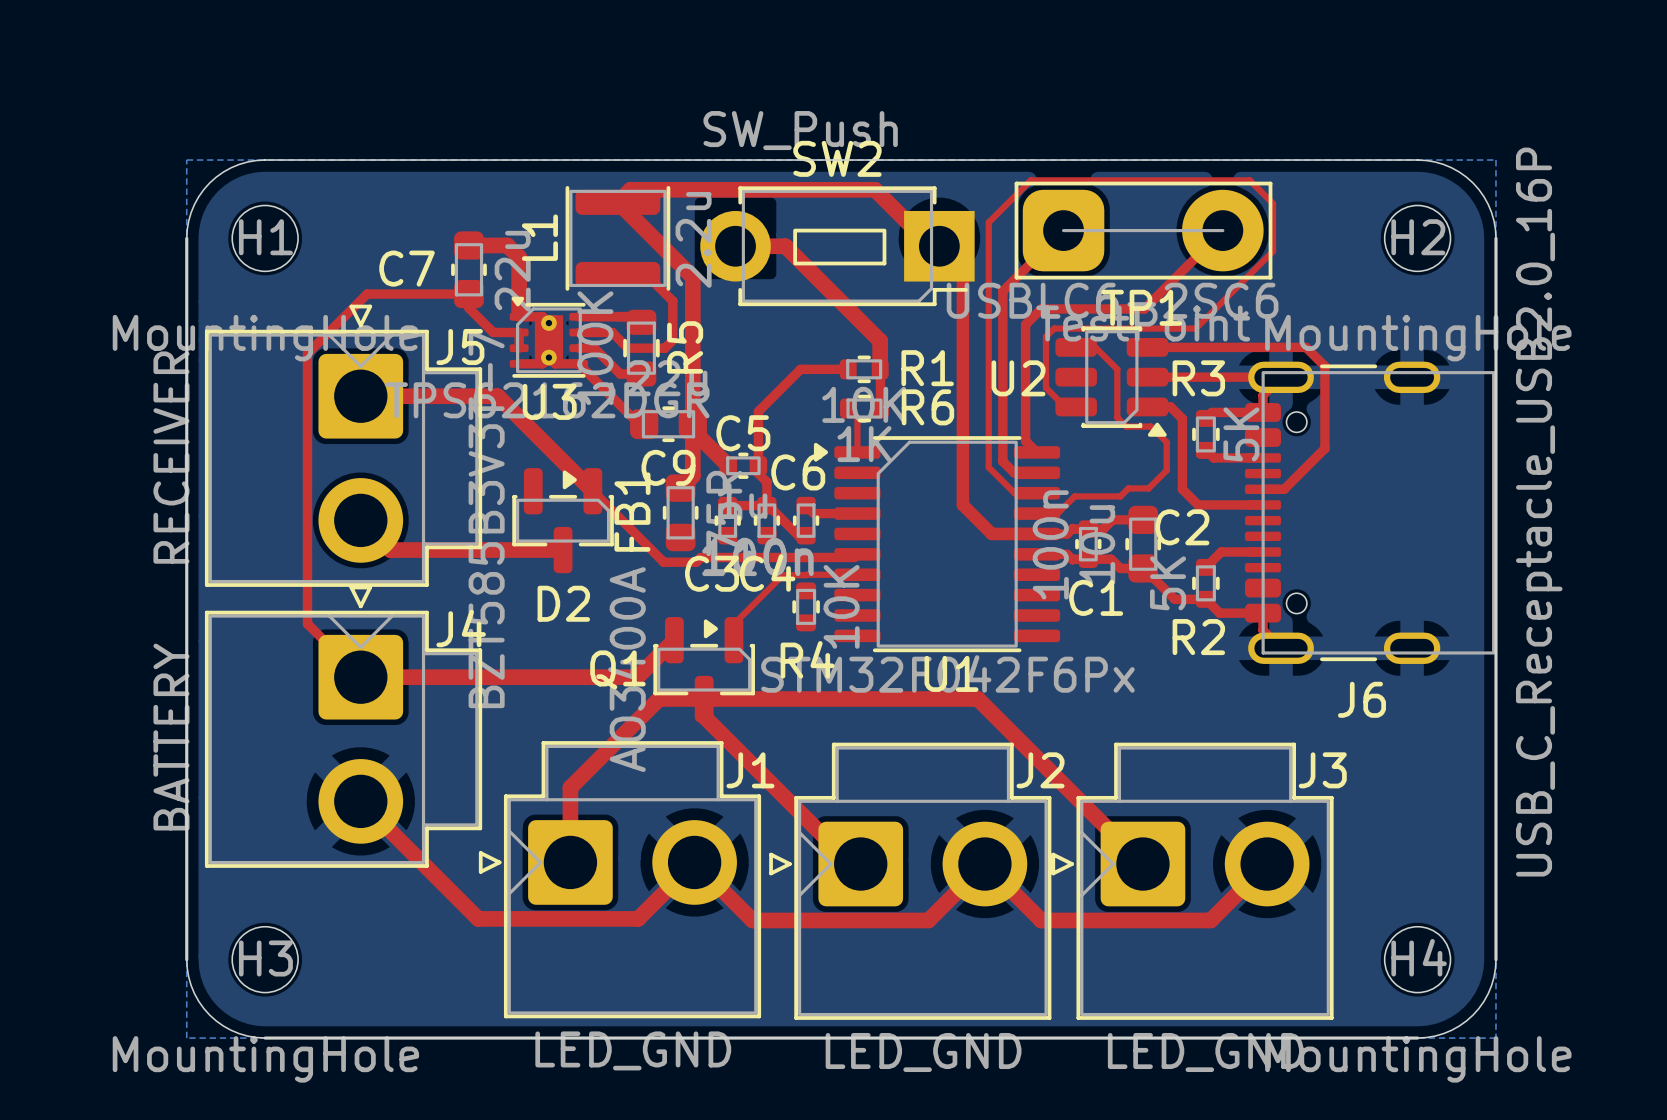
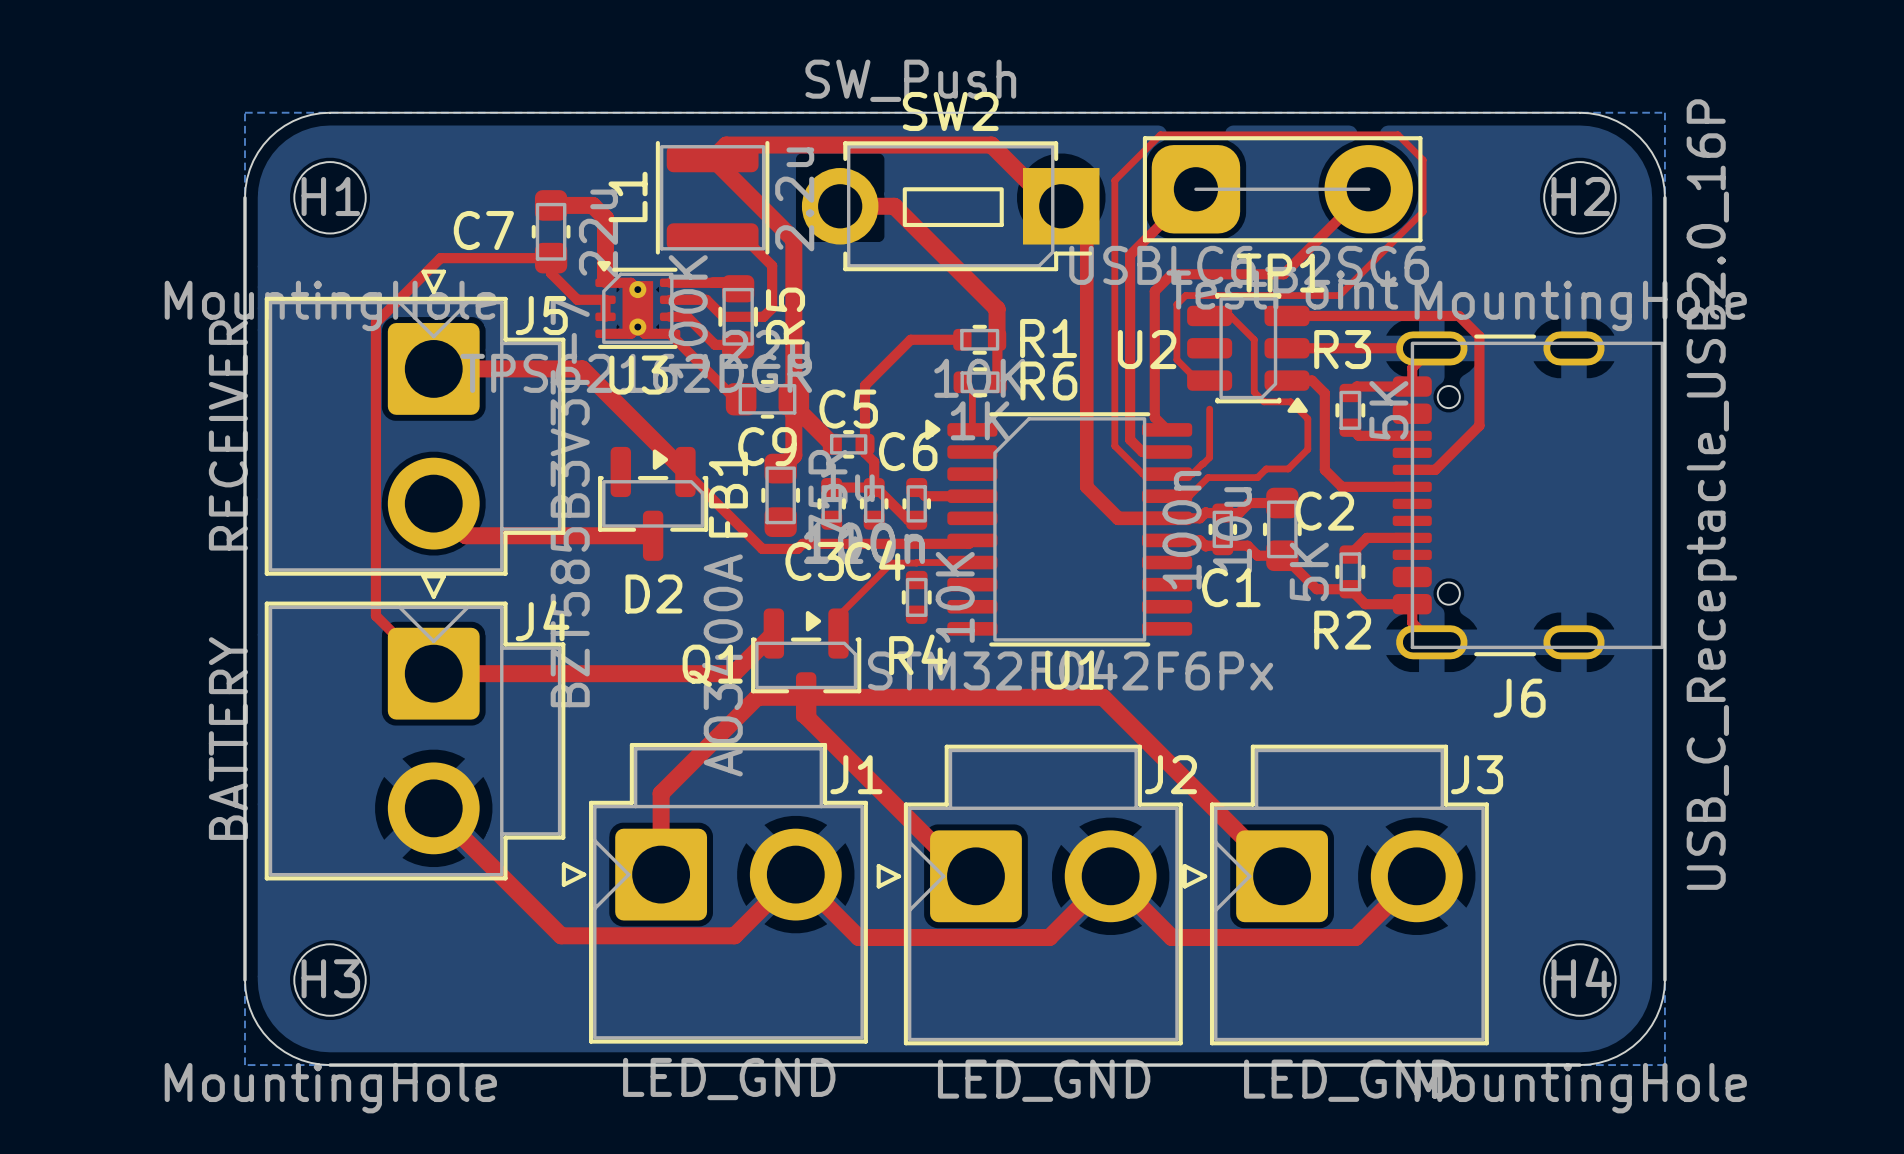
top track: none -> (1209, 409) (1209, 457) (1192, 474) (1167, 474)

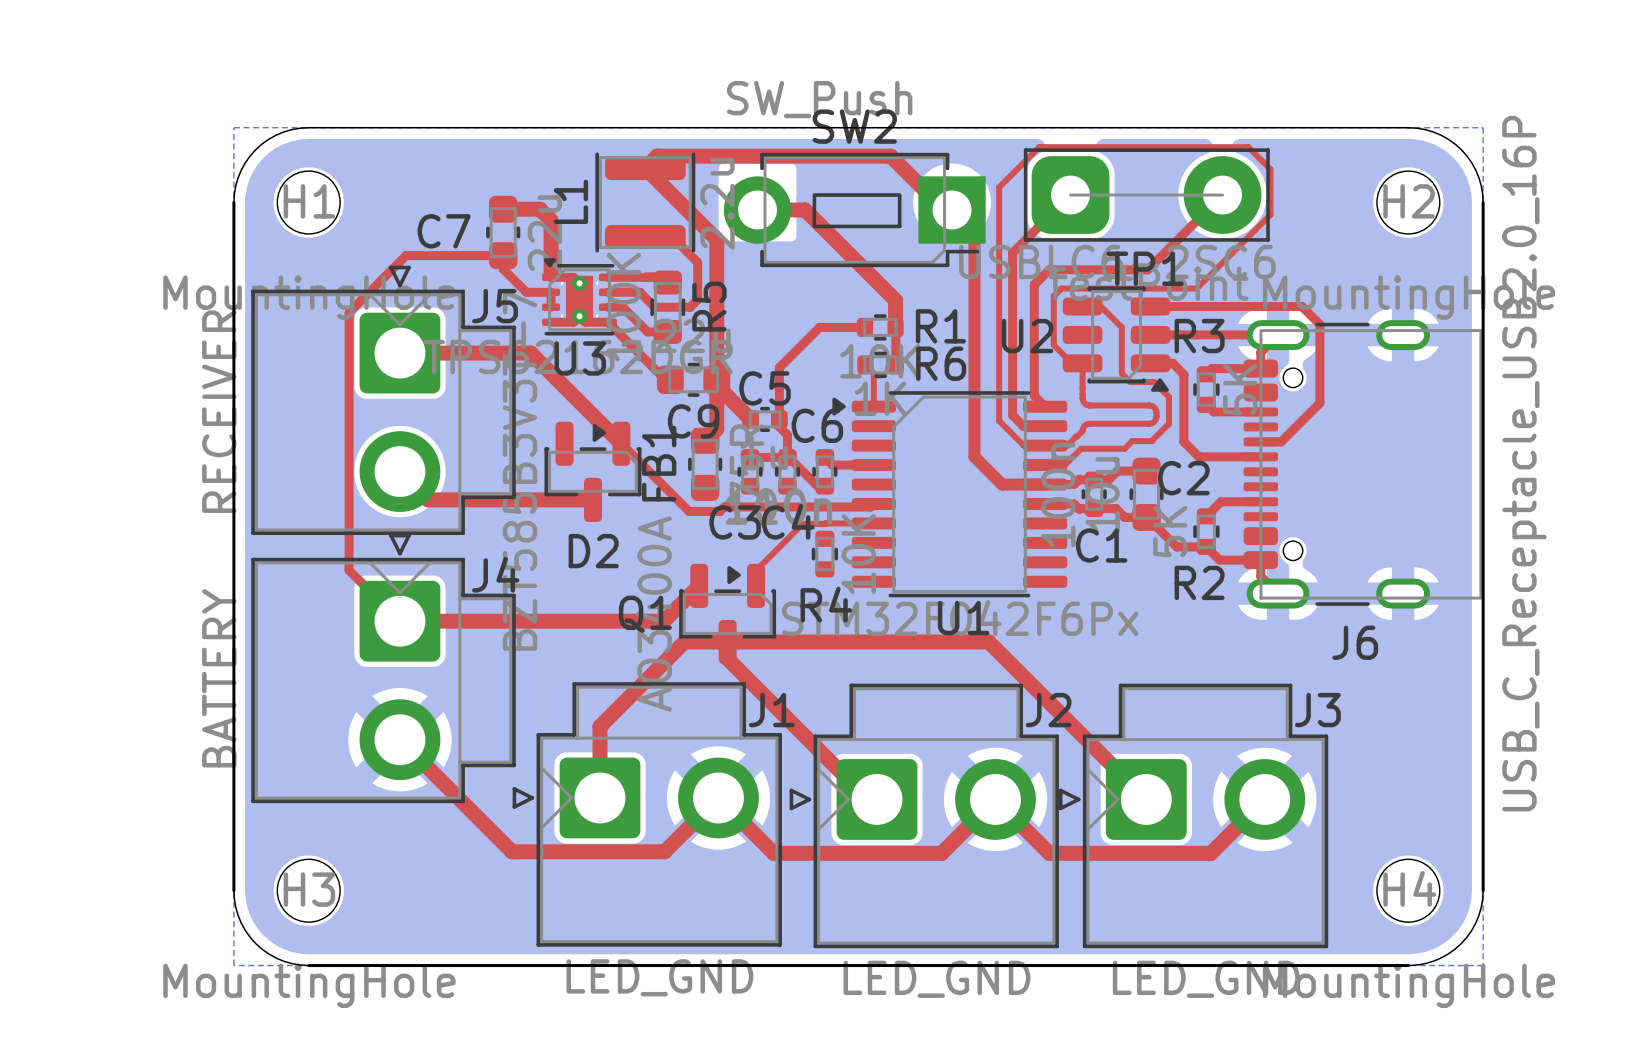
top track: none -> (1082, 363) (1082, 388)
top track: (1209, 420) (1209, 457) -> (1082, 398) (1084, 402) (1088, 405) (1150, 405) (1154, 407) (1156, 412) (1155, 420) (1151, 423) (1088, 423) (1084, 426) (1082, 431)

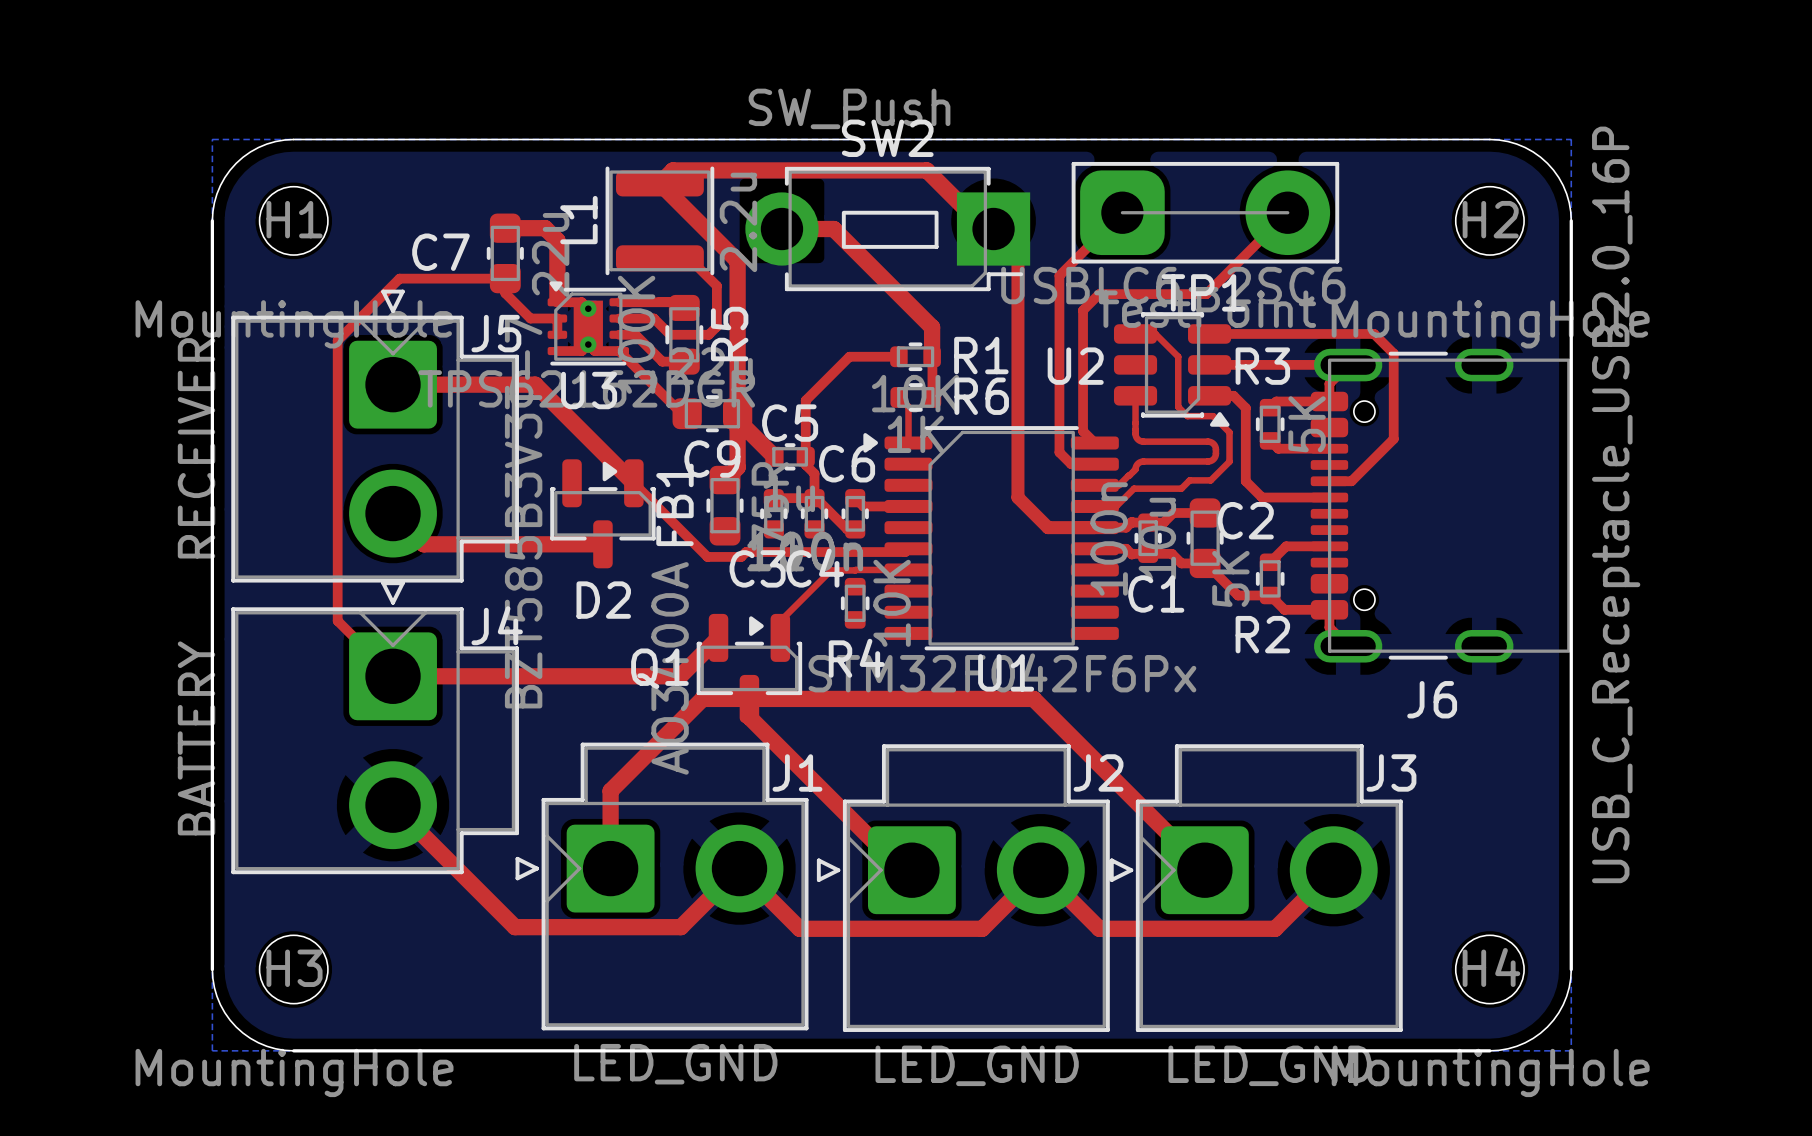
top track: (1082, 363) (1072, 363) (1053, 345) (1053, 296) (1061, 288) (1196, 288) (1270, 214) (1270, 169) (1248, 147) (1039, 147) (999, 187) (999, 420) (1023, 445) (1045, 445) -> none

